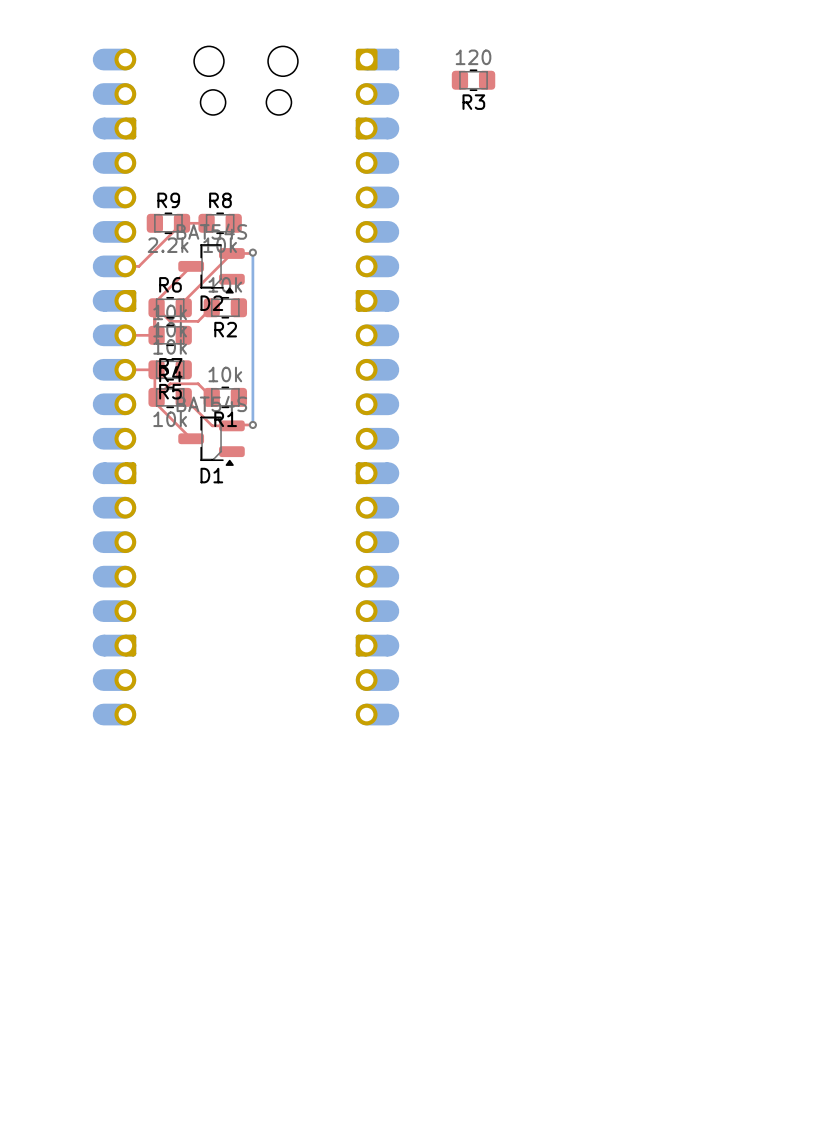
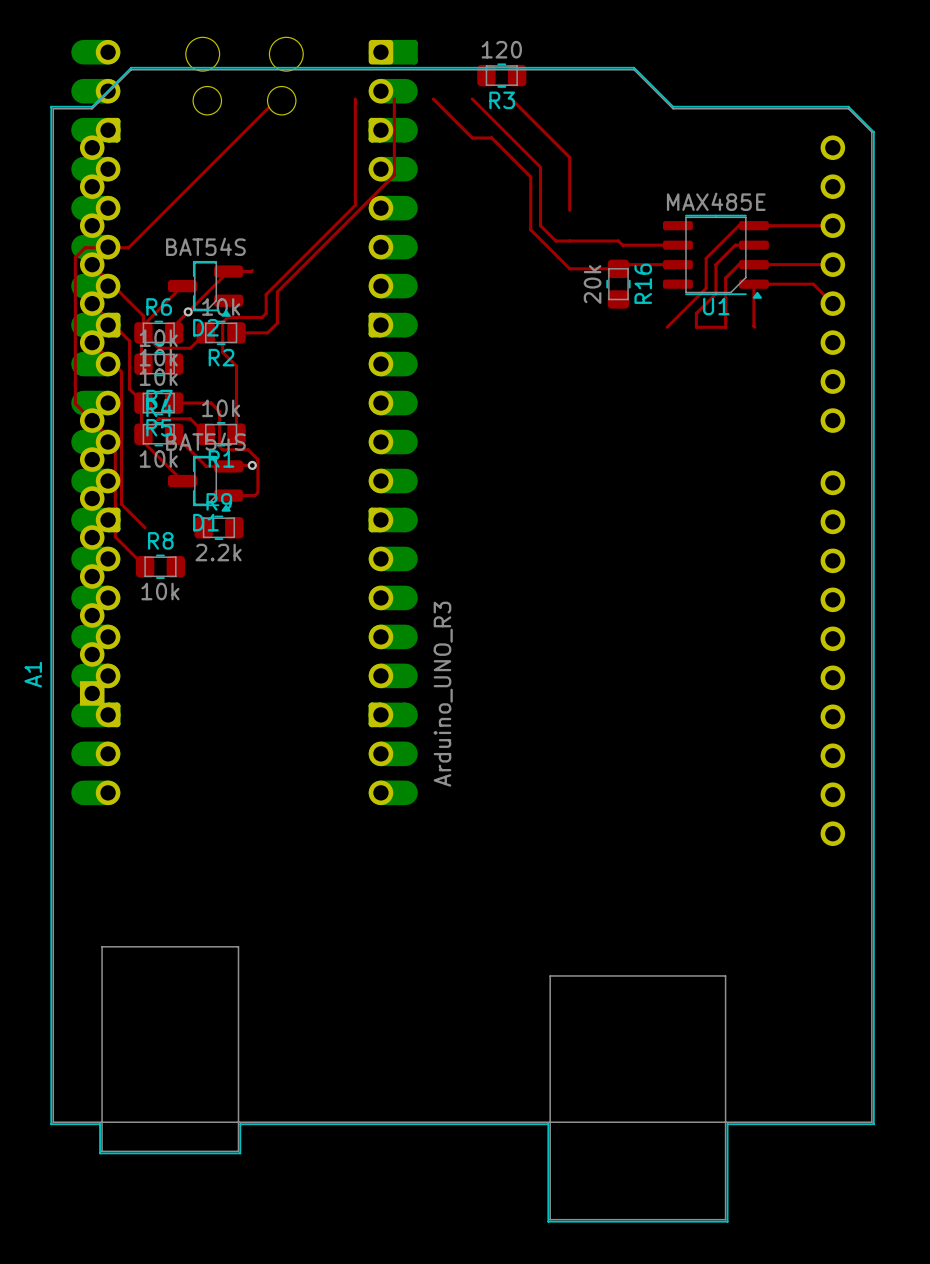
top track: none -> (277, 98) (128, 247) (85, 247) (75, 257) (75, 403) (115, 443) (115, 536) (145, 566)
top track: none -> (355, 98) (355, 205) (266, 294) (266, 313) (262, 317) (227, 317) (222, 322) (222, 352) (236, 366) (236, 434)
top track: none -> (394, 98) (394, 175) (277, 291) (277, 323) (267, 332) (236, 332)
top track: none -> (433, 98) (472, 137) (491, 137) (530, 176) (530, 229) (569, 268) (618, 268) (622, 264) (677, 264)
top track: none -> (472, 98) (540, 167) (540, 225) (555, 241) (618, 241) (622, 245) (677, 245)
top track: none -> (511, 98) (569, 157) (569, 210)
top track: none -> (832, 225) (738, 225) (706, 258) (706, 288) (667, 327)
R9 position: (168, 223) -> (218, 527)
top track: (206, 223) (182, 223) (138, 266) (125, 266) -> none
R8 position: (220, 223) -> (160, 566)
top track: none -> (753, 245) (735, 245) (715, 264) (715, 293) (696, 313) (696, 327) (725, 327) (725, 277) (738, 264) (832, 264)
U1: none -> MAX485E (715, 256)
top track: none -> (92, 264) (143, 315) (143, 332)
bottom track: (252, 252) (252, 424) -> none
via position: (252, 252) -> (188, 311)
R16: none -> 20k (618, 284)
top track: none -> (92, 303) (129, 340) (129, 389) (143, 403)
top track: none -> (832, 303) (813, 284) (753, 284) (754, 327)
top track: none -> (92, 342) (121, 371) (121, 504) (145, 527)
top track: (125, 335) (154, 335) -> none
top track: (125, 369) (154, 369) -> none
top track: none -> (174, 403) (211, 403) (219, 411) (219, 446) (222, 449) (248, 449) (257, 459) (257, 492) (254, 495) (228, 495)
A1: none -> Arduino_UNO_R3 (462, 644)

